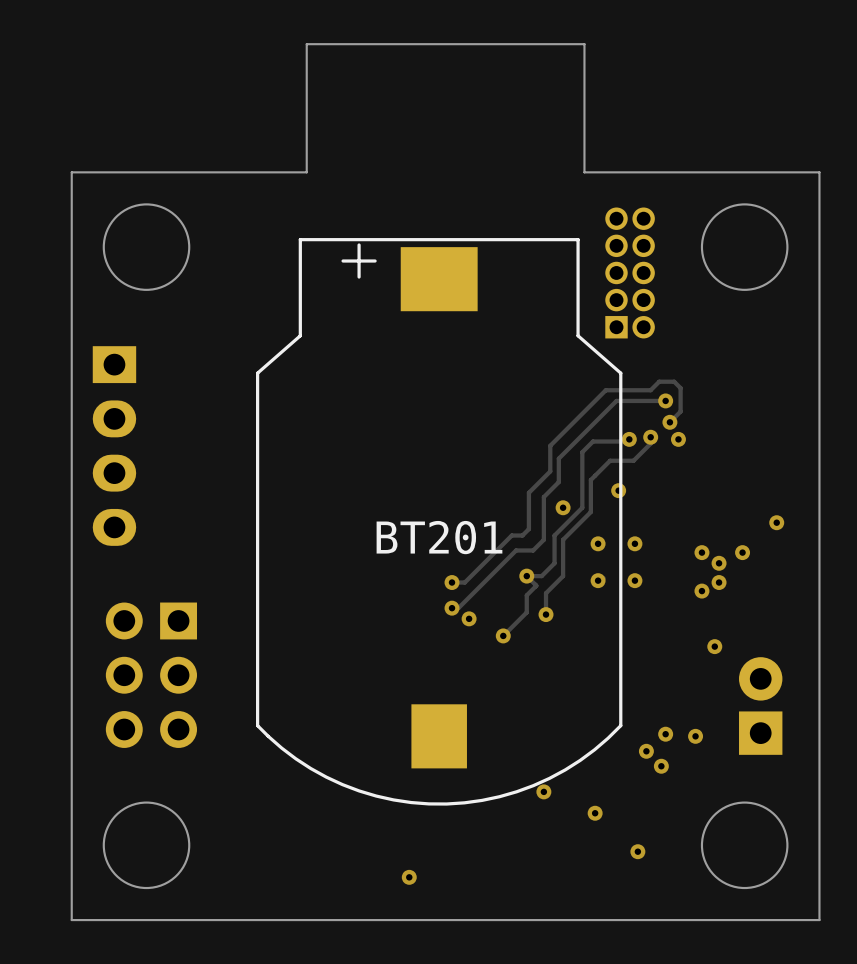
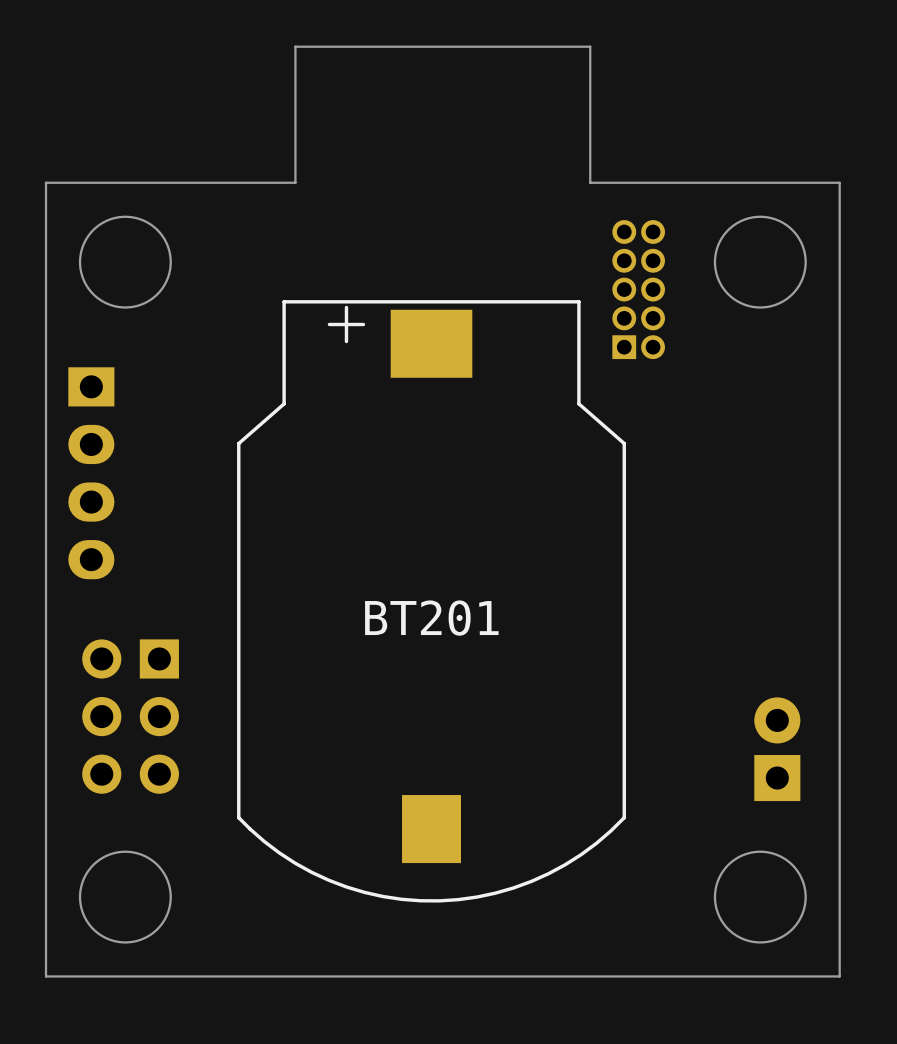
track: (665, 400) (616, 400) (558, 458) (558, 482) (543, 497) (543, 539) (533, 550) (516, 550) (458, 608) (452, 608) -> none
via: (665, 400) -> none
track: (669, 422) (680, 411) (680, 388) (674, 381) (659, 381) (650, 390) (605, 390) (550, 445) (550, 471) (528, 492) (528, 529) (522, 535) (511, 535) (464, 582) (452, 582) -> none
via: (669, 422) -> none
track: (650, 437) (650, 443) (633, 460) (610, 460) (590, 479) (590, 512) (563, 539) (563, 576) (546, 593) (546, 614) -> none
via: (650, 437) -> none
track: (629, 439) (627, 441) (593, 441) (582, 452) (582, 507) (554, 535) (554, 563) (541, 576) (526, 576) (536, 585) -> none
via: (629, 439) -> none
via: (678, 439) -> none
via: (618, 490) -> none
via: (563, 507) -> none
BT201 position: (439, 521) -> (431, 601)
via: (776, 522) -> none
via: (598, 543) -> none
via: (634, 543) -> none
via: (701, 552) -> none
via: (742, 552) -> none
via: (719, 563) -> none
via: (526, 576) -> none
via: (598, 580) -> none
via: (634, 580) -> none
via: (452, 582) -> none
via: (719, 582) -> none
track: (535, 584) (526, 595) (526, 612) (503, 635) -> none
via: (701, 591) -> none
via: (452, 608) -> none
via: (546, 614) -> none
via: (469, 618) -> none
via: (503, 635) -> none
via: (714, 646) -> none
via: (665, 734) -> none
via: (695, 736) -> none
via: (646, 751) -> none
via: (661, 766) -> none
via: (543, 791) -> none
via: (595, 813) -> none
via: (637, 851) -> none
via: (409, 877) -> none

